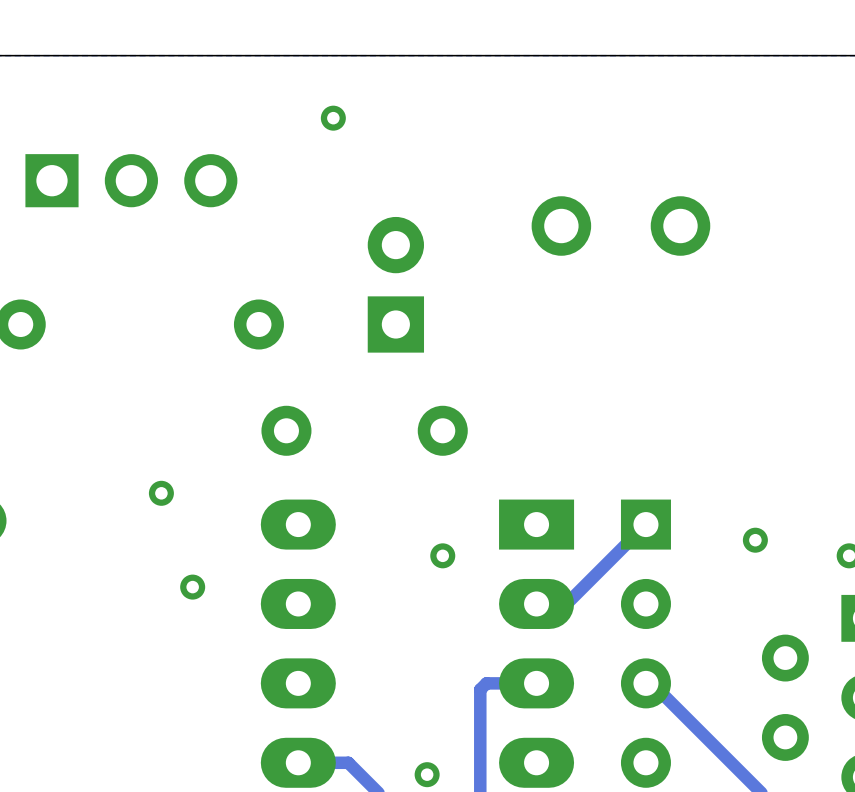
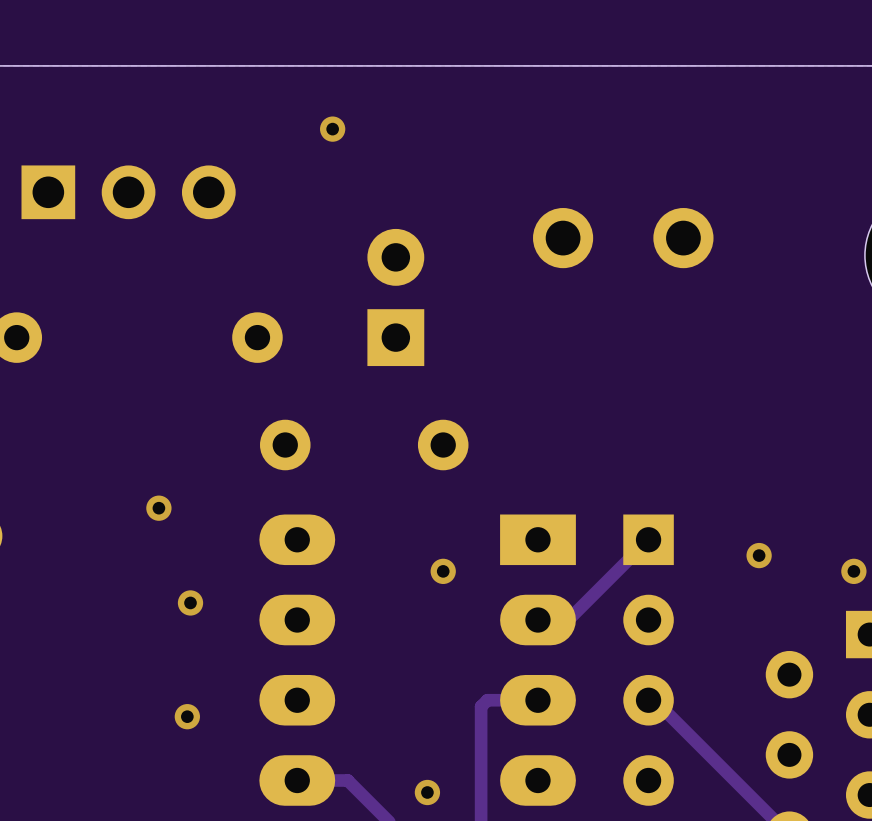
via: none -> (187, 716)

